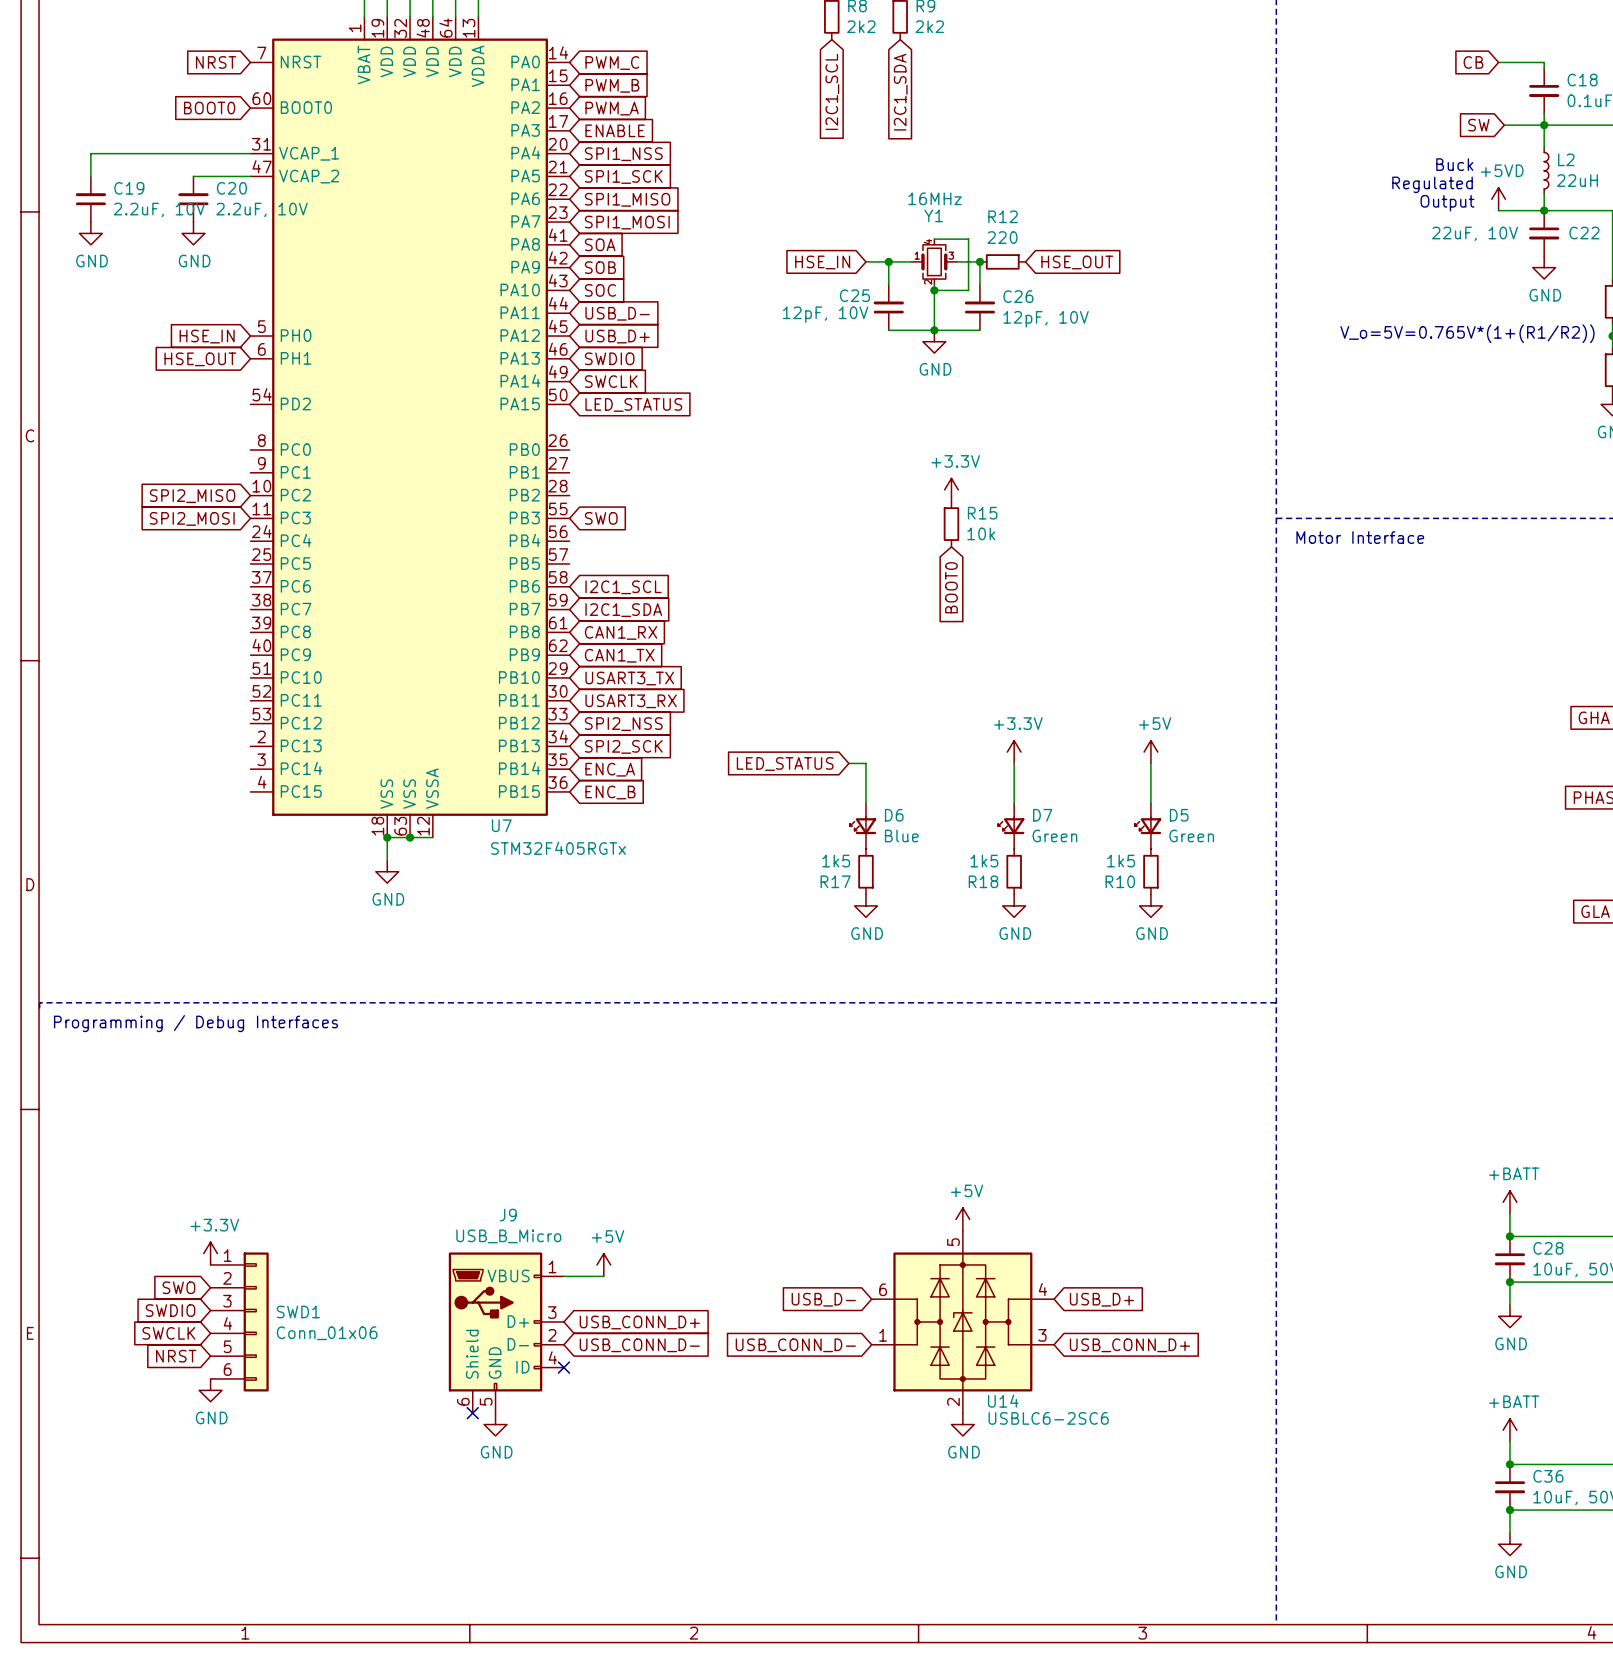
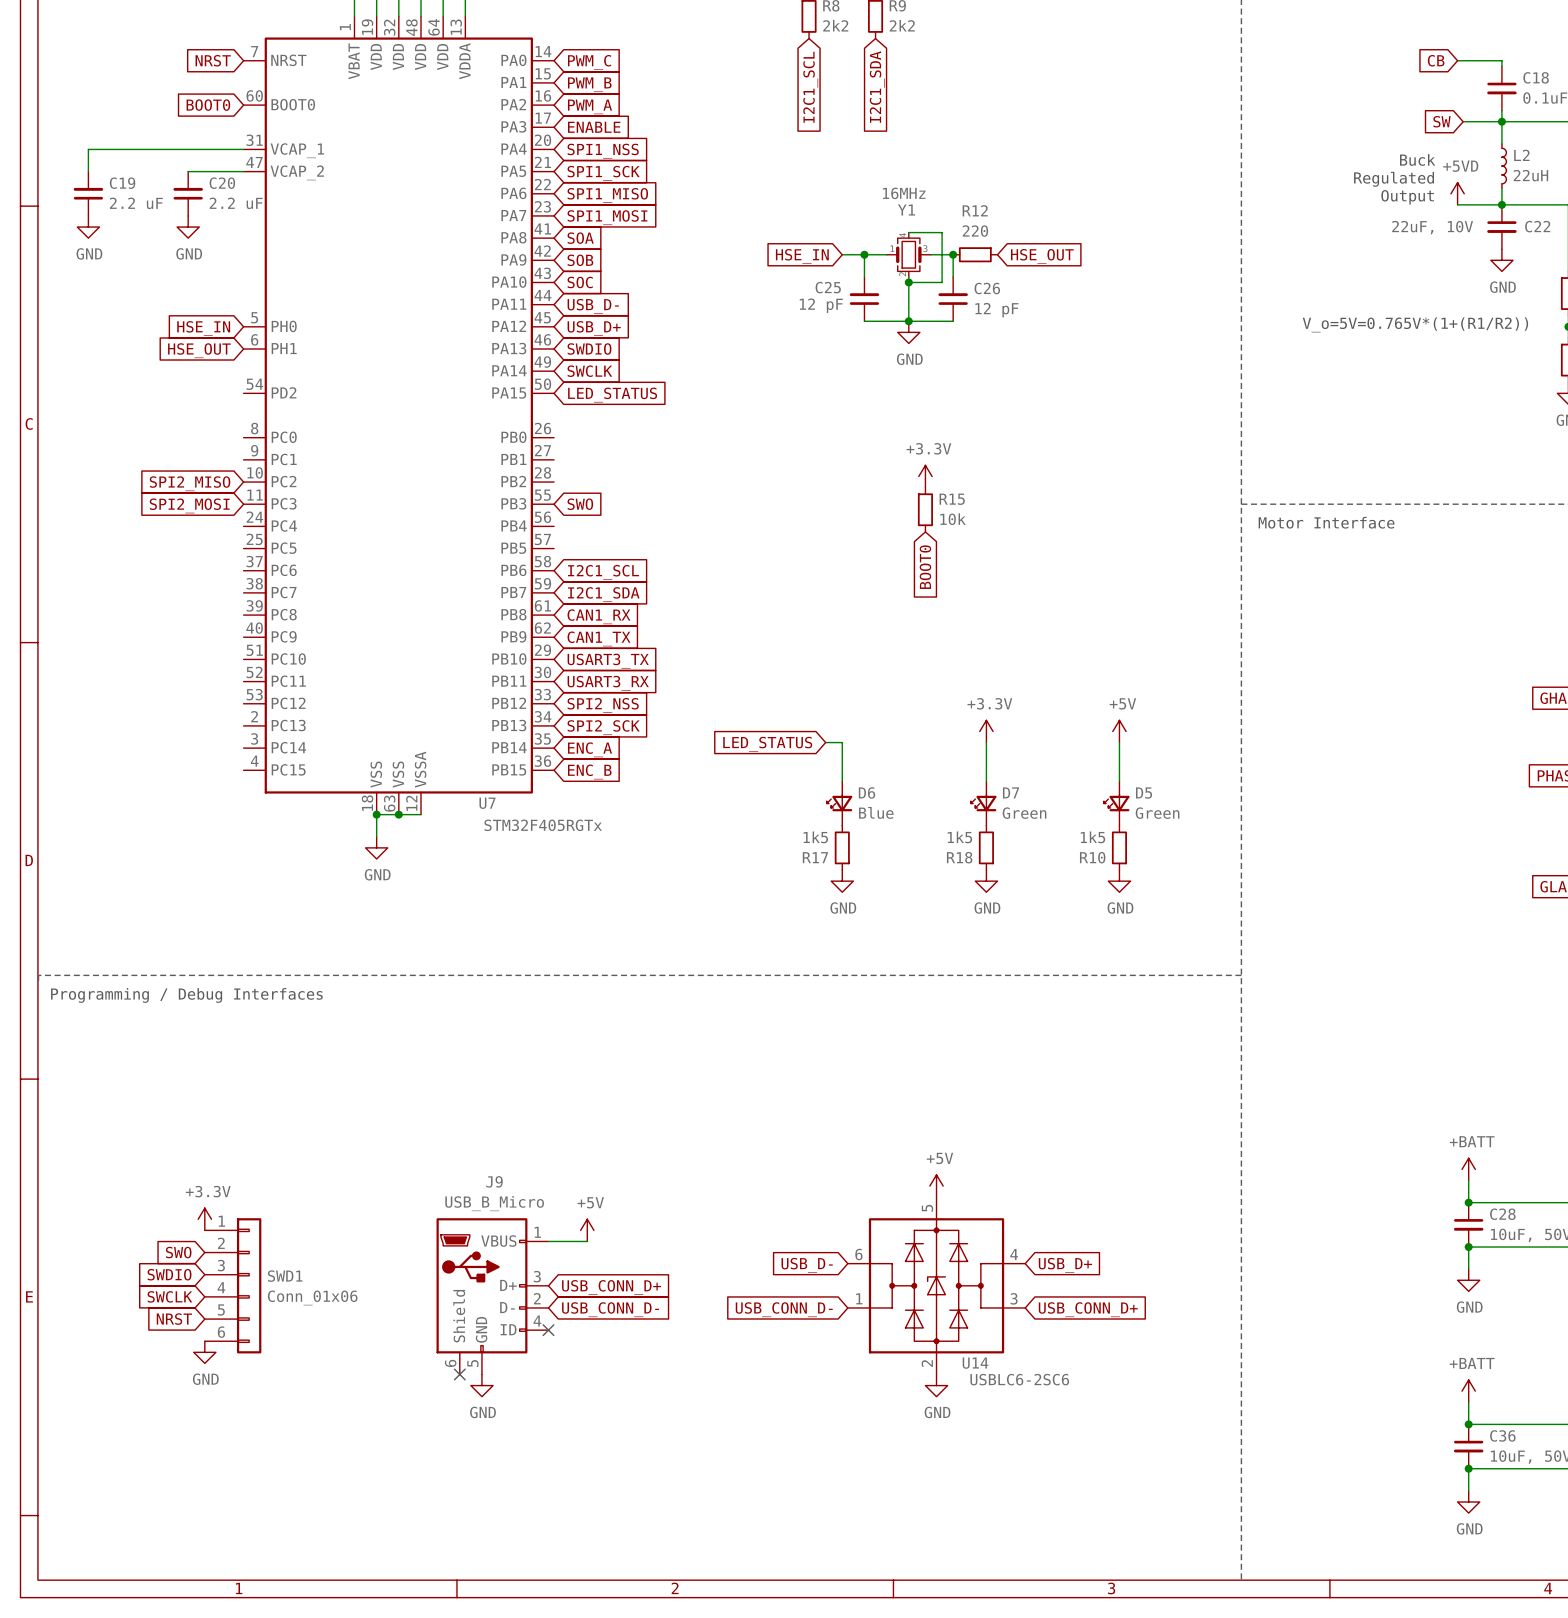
C19 value: 2.2uF, 10V (159, 209) -> 2.2 uF (136, 203)
C20 value: 2.2uF, 10V (262, 209) -> 2.2 uF (236, 203)
C25 value: 12pF, 10V (825, 314) -> 12 pF (821, 305)
C26 value: 12pF, 10V (1046, 319) -> 12 pF (996, 310)

